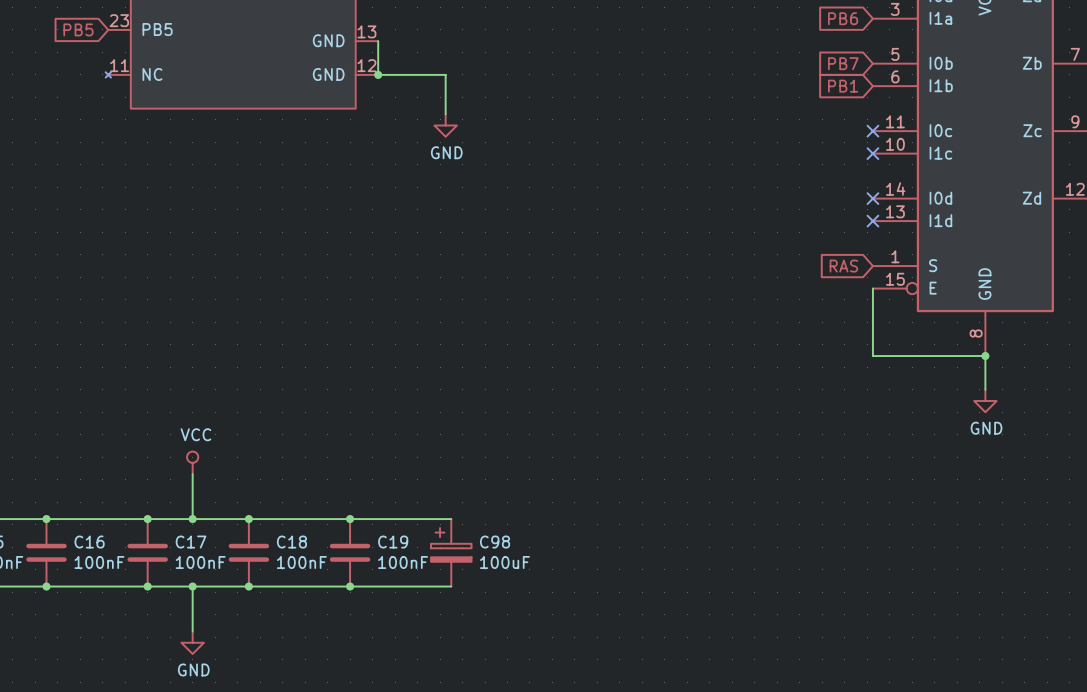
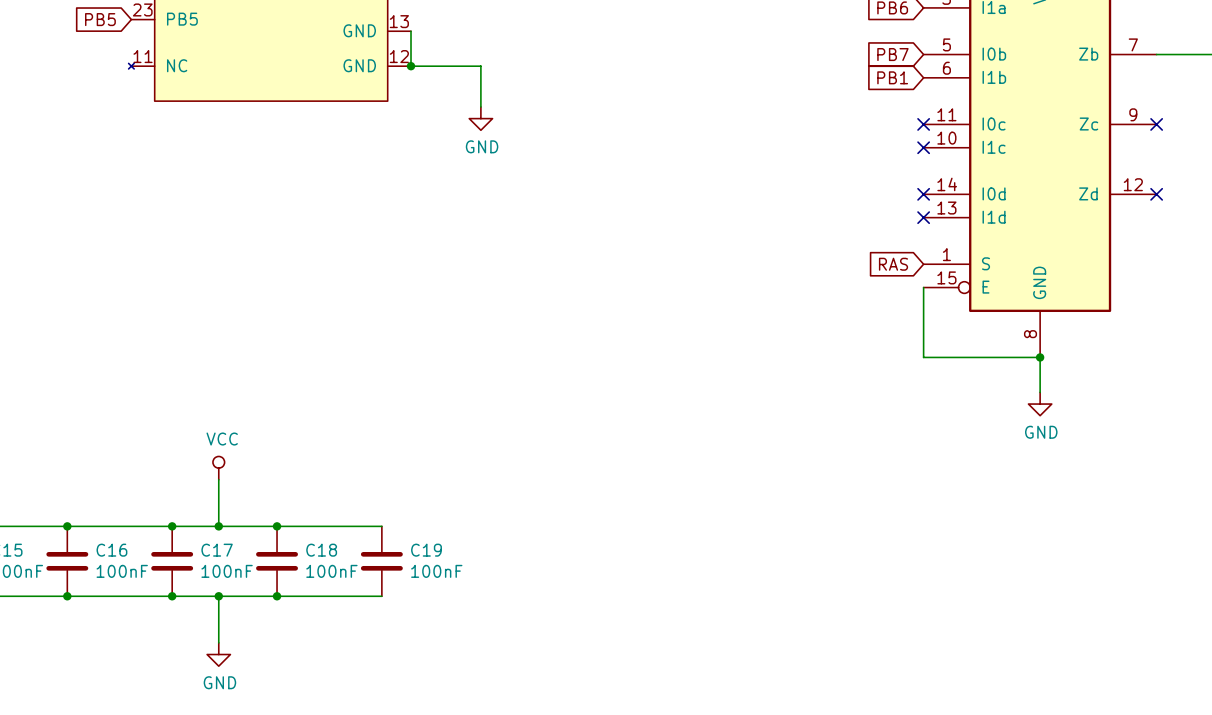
wire: (350, 519) (451, 519) -> none
junction: (350, 519) -> none
C98: 100uF (451, 552) -> none
wire: (350, 586) (451, 586) -> none
junction: (350, 586) -> none

